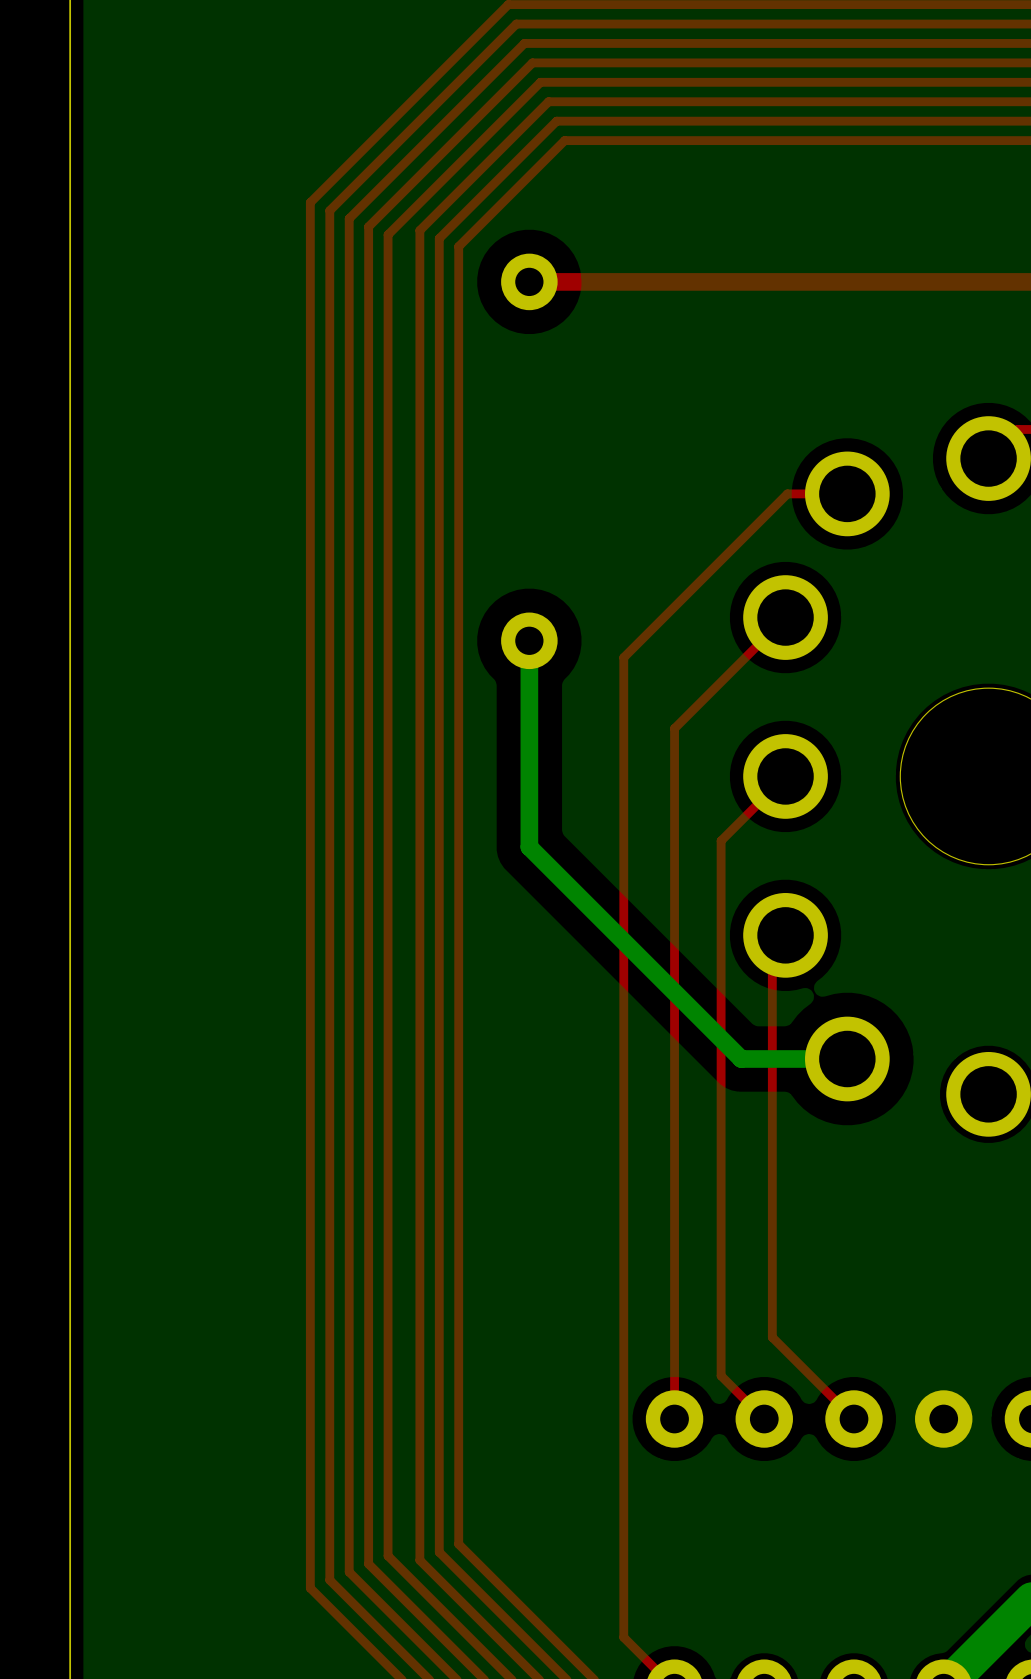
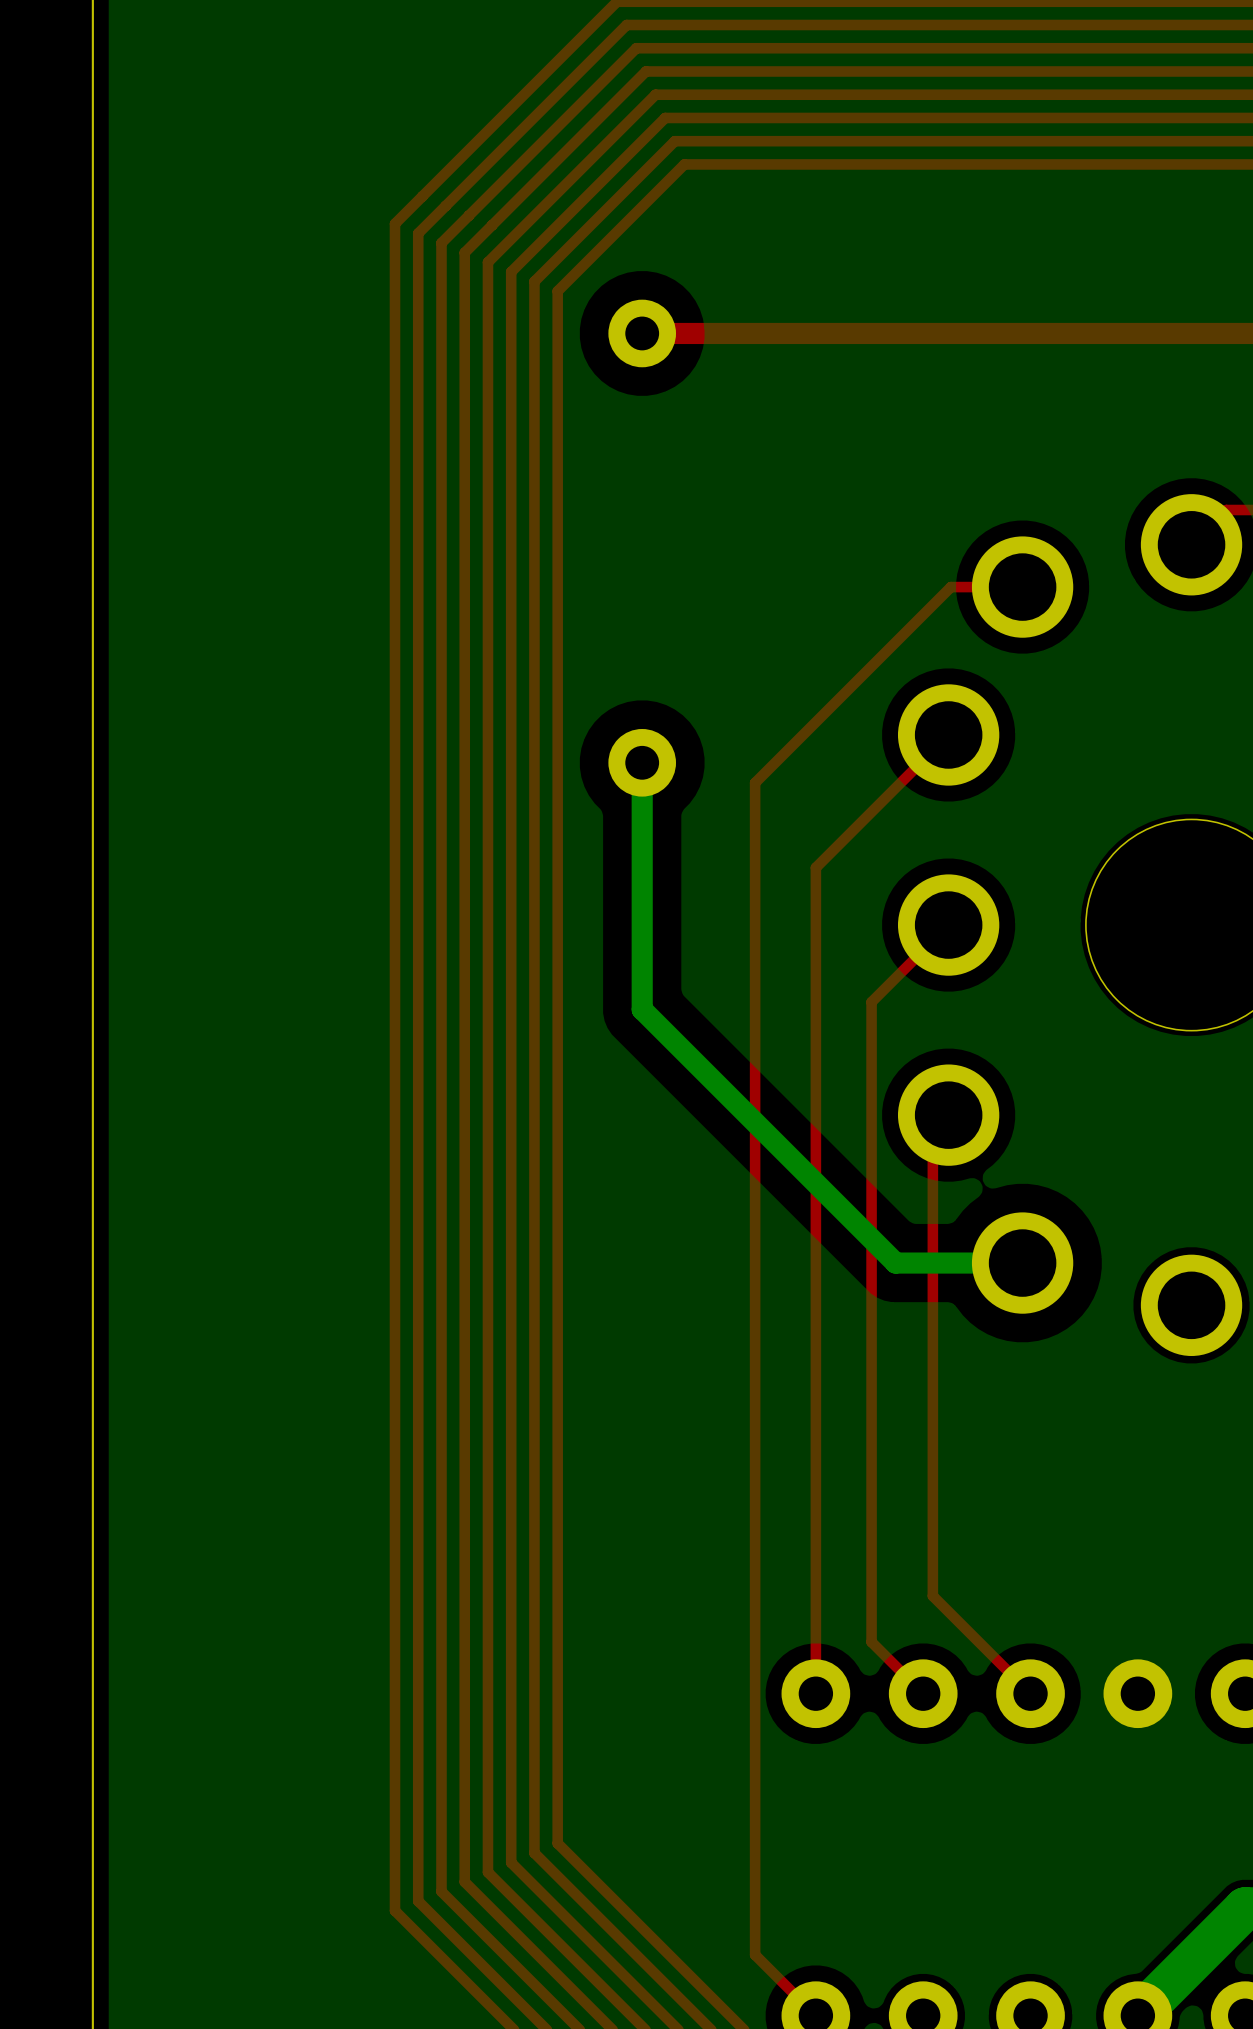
top track: (322, 190) (310, 202) (310, 1588) (322, 1600) -> (395, 223) (395, 1910)
top track: (342, 198) (329, 210) (329, 1580) (342, 1592) -> (418, 233) (418, 1901)
top track: (361, 206) (349, 218) (349, 1572) (361, 1584) -> (441, 243) (441, 1891)
top track: (381, 214) (368, 226) (368, 1564) (381, 1576) -> (464, 252) (464, 1881)
top track: (400, 222) (388, 234) (388, 1555) (400, 1568) -> (487, 262) (487, 1872)

